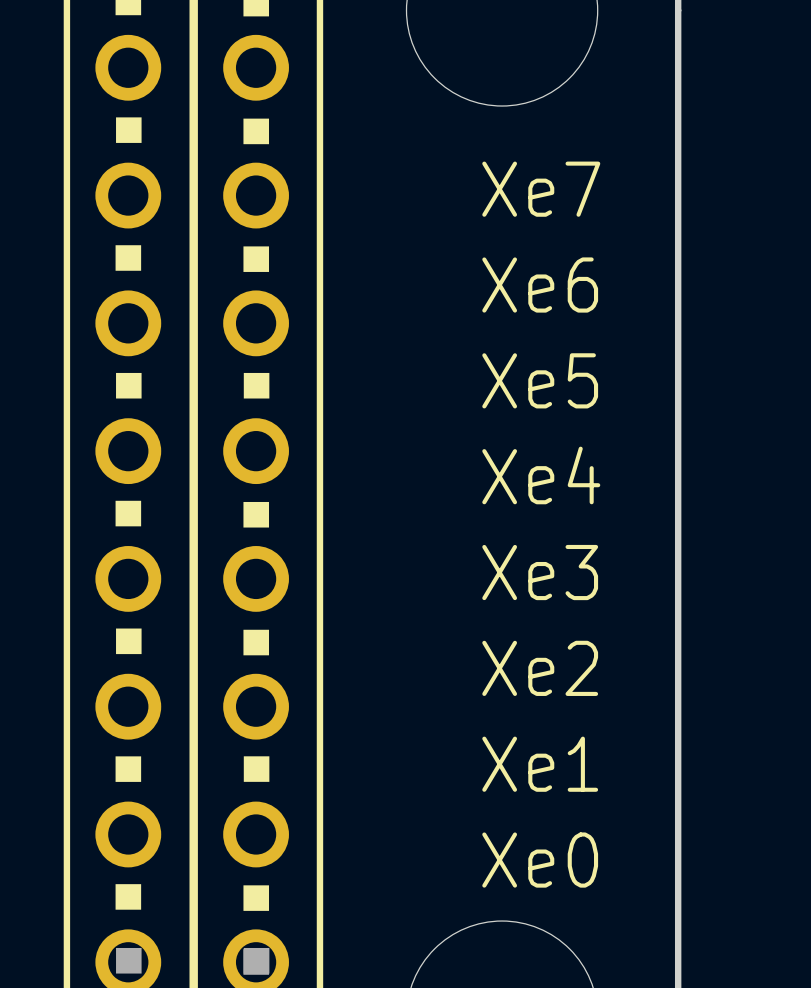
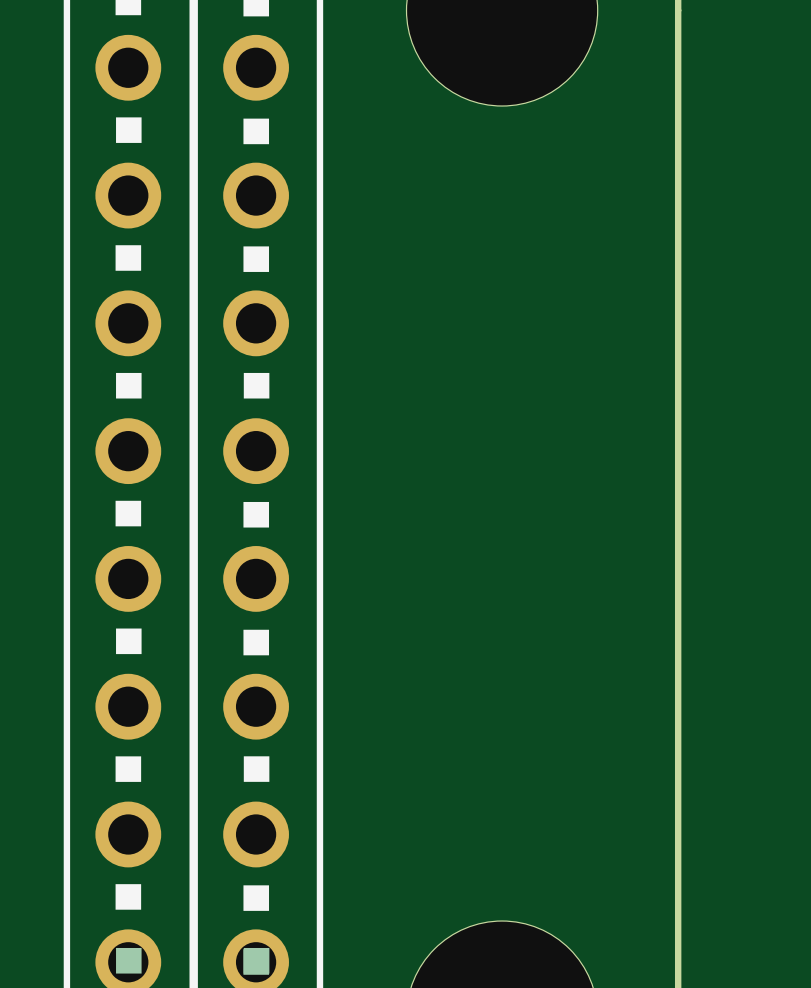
text: Xe7 (541, 189) -> none
text: Xe6 (540, 285) -> none
text: Xe5 (540, 380) -> none
text: Xe4 (541, 475) -> none
text: Xe3 (540, 572) -> none
text: Xe2 (540, 668) -> none
text: Xe1 (540, 764) -> none
text: Xe0 (540, 860) -> none

